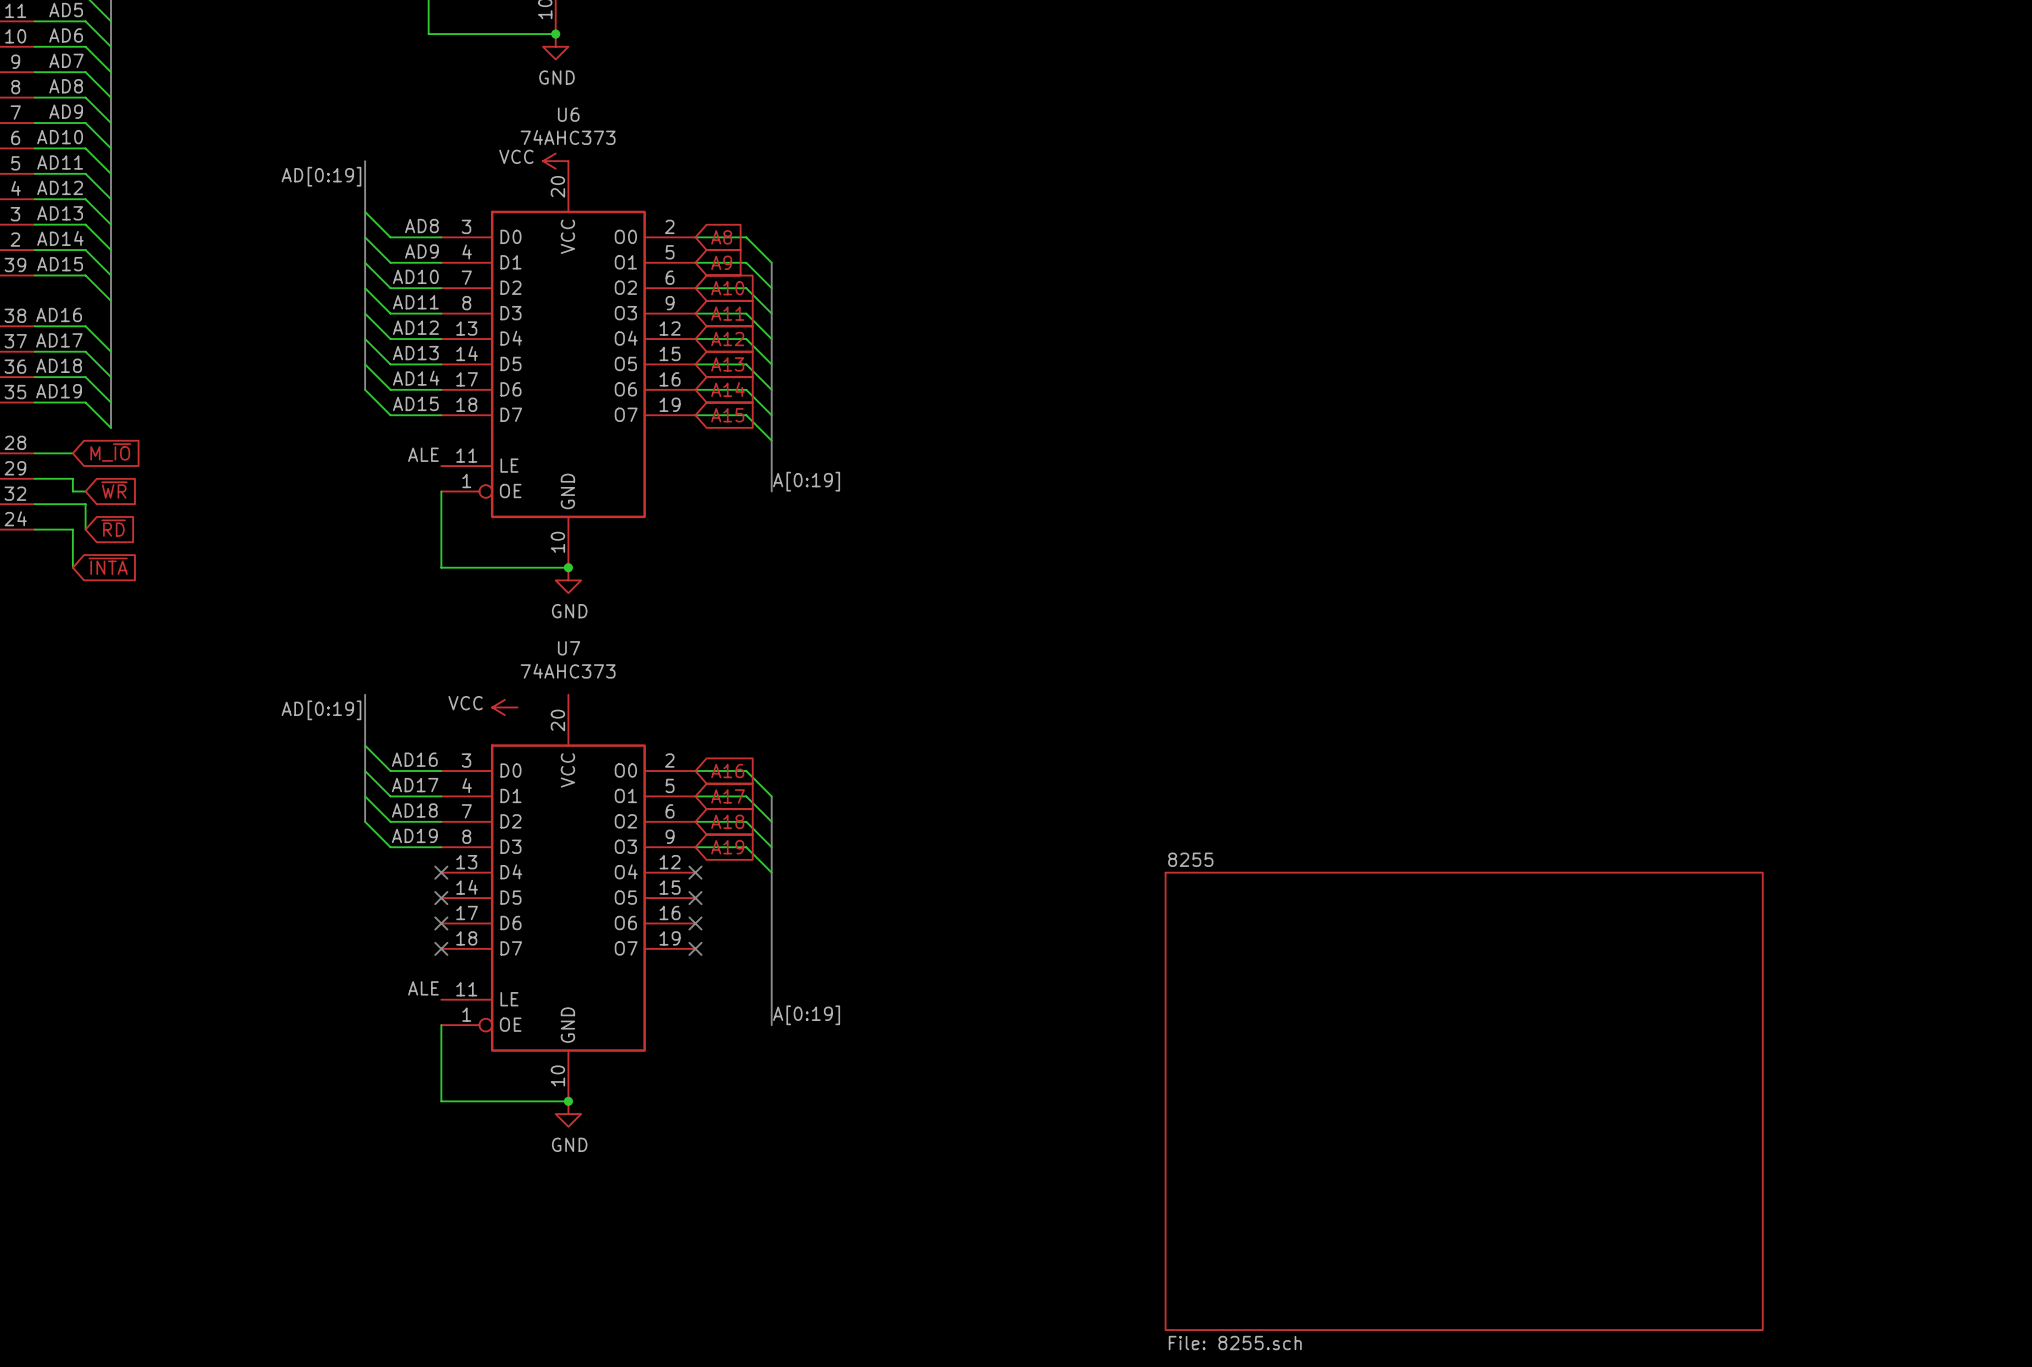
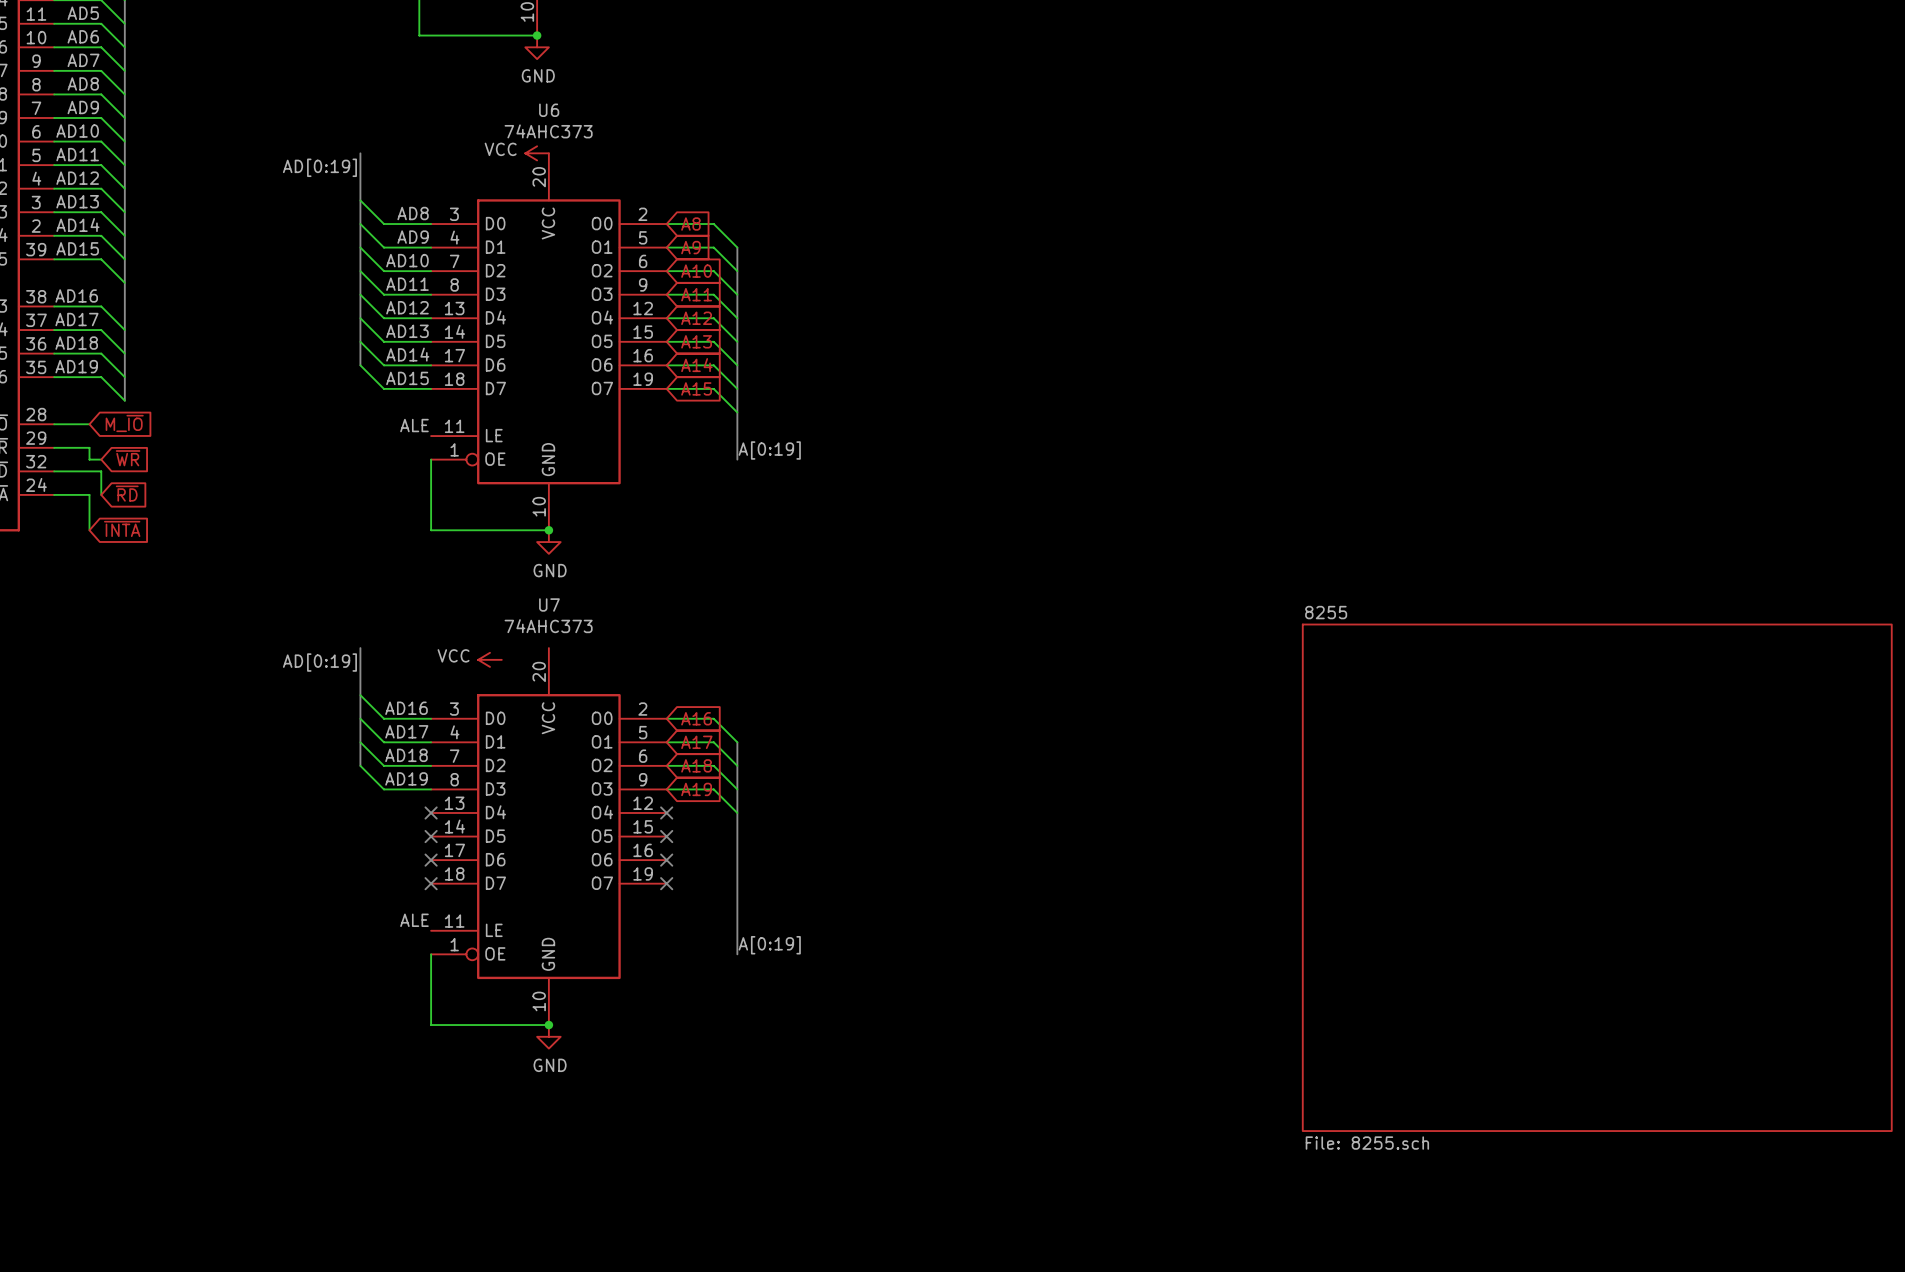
sheet 8255 name position: 8255 (1190, 859) -> 8255 (1326, 612)
sheet 8255 shape: [1165, 872, 1763, 1331] -> [1302, 624, 1892, 1132]
sheet 8255 value position: File: 8255.sch (1235, 1343) -> File: 8255.sch (1367, 1143)

